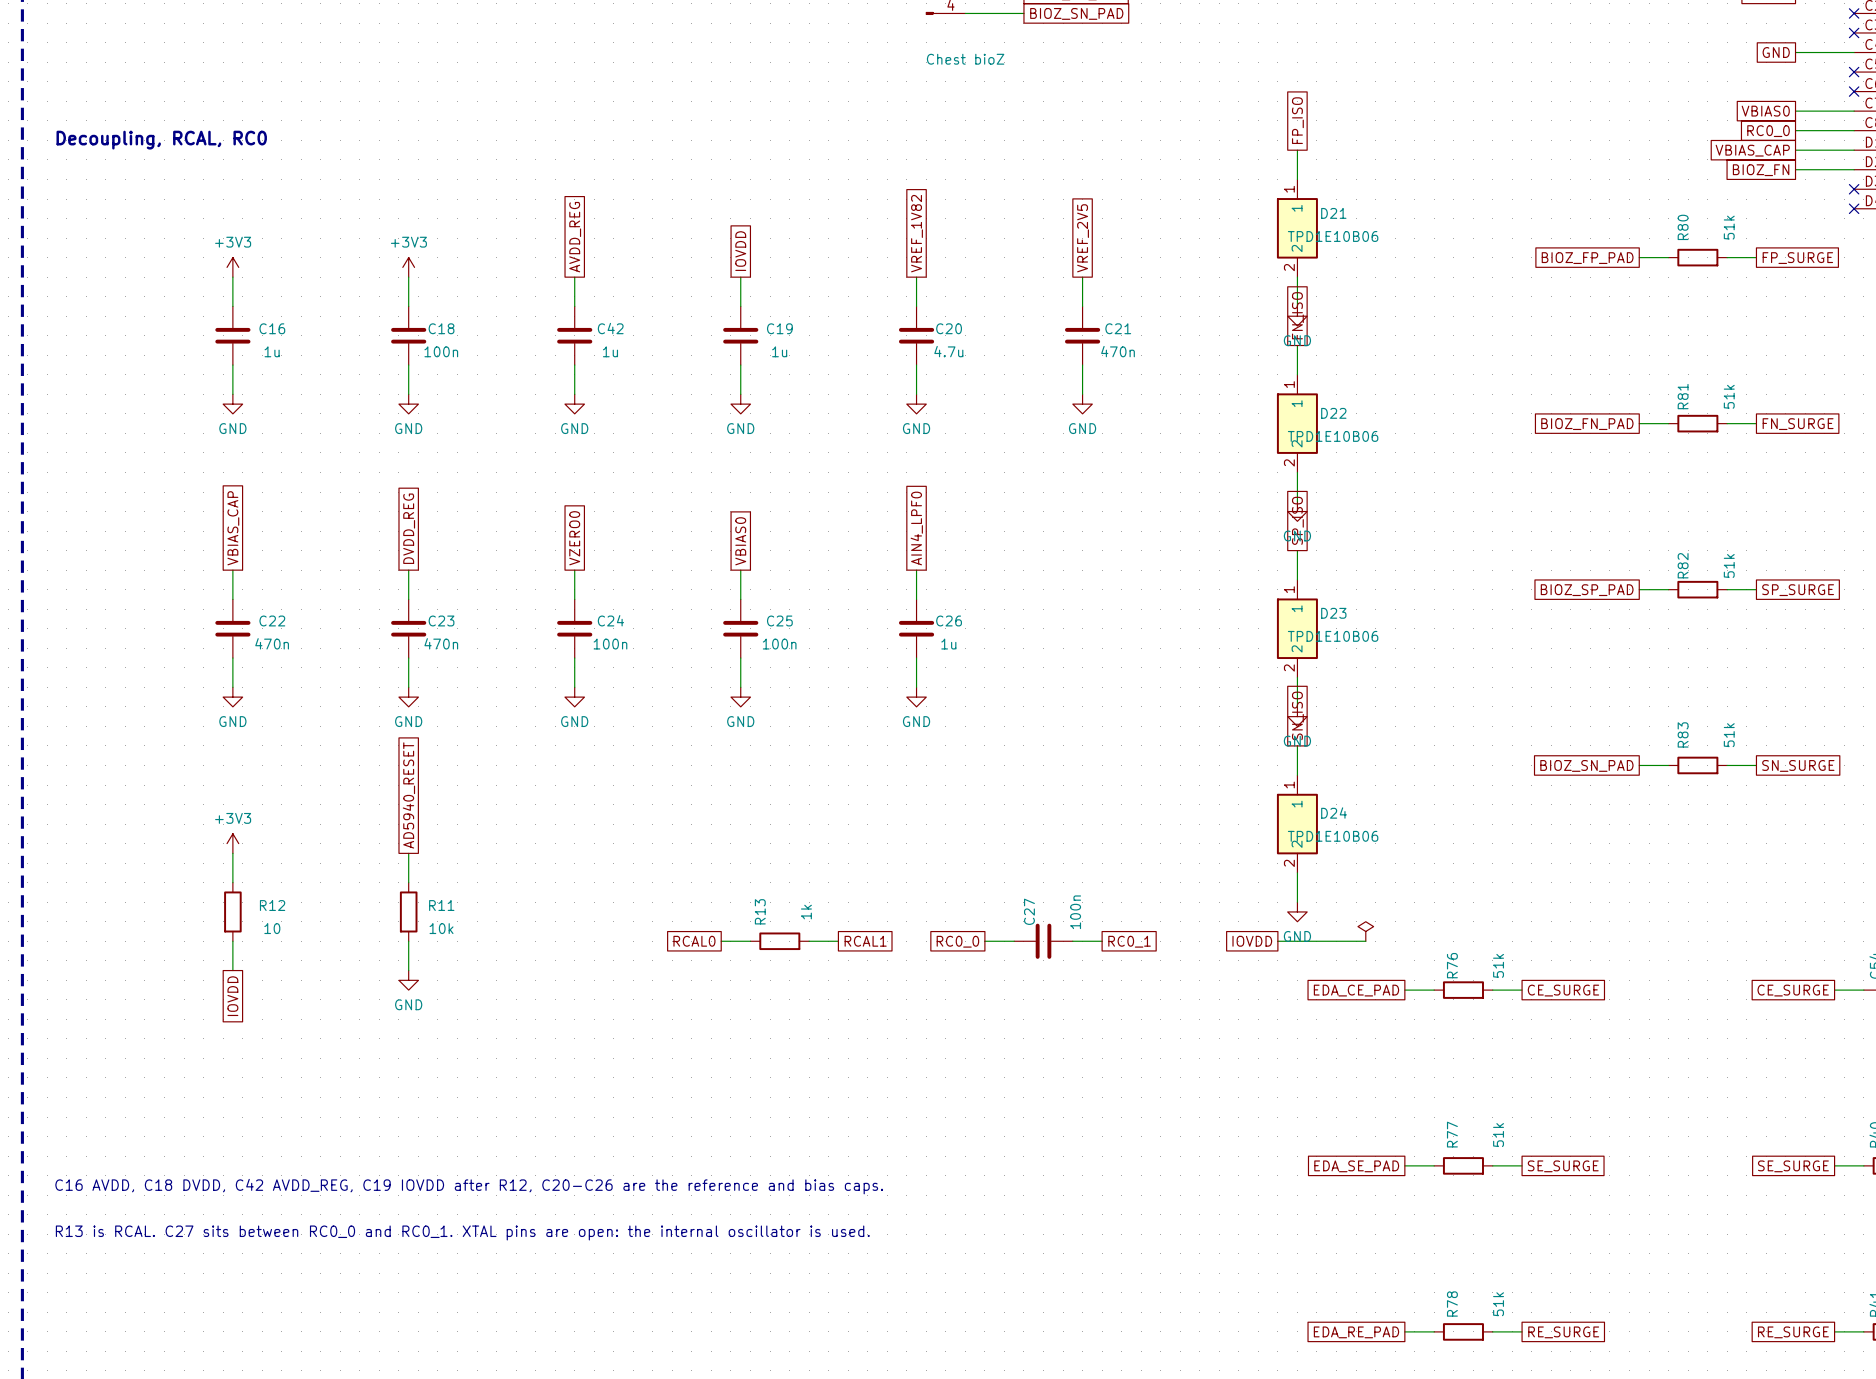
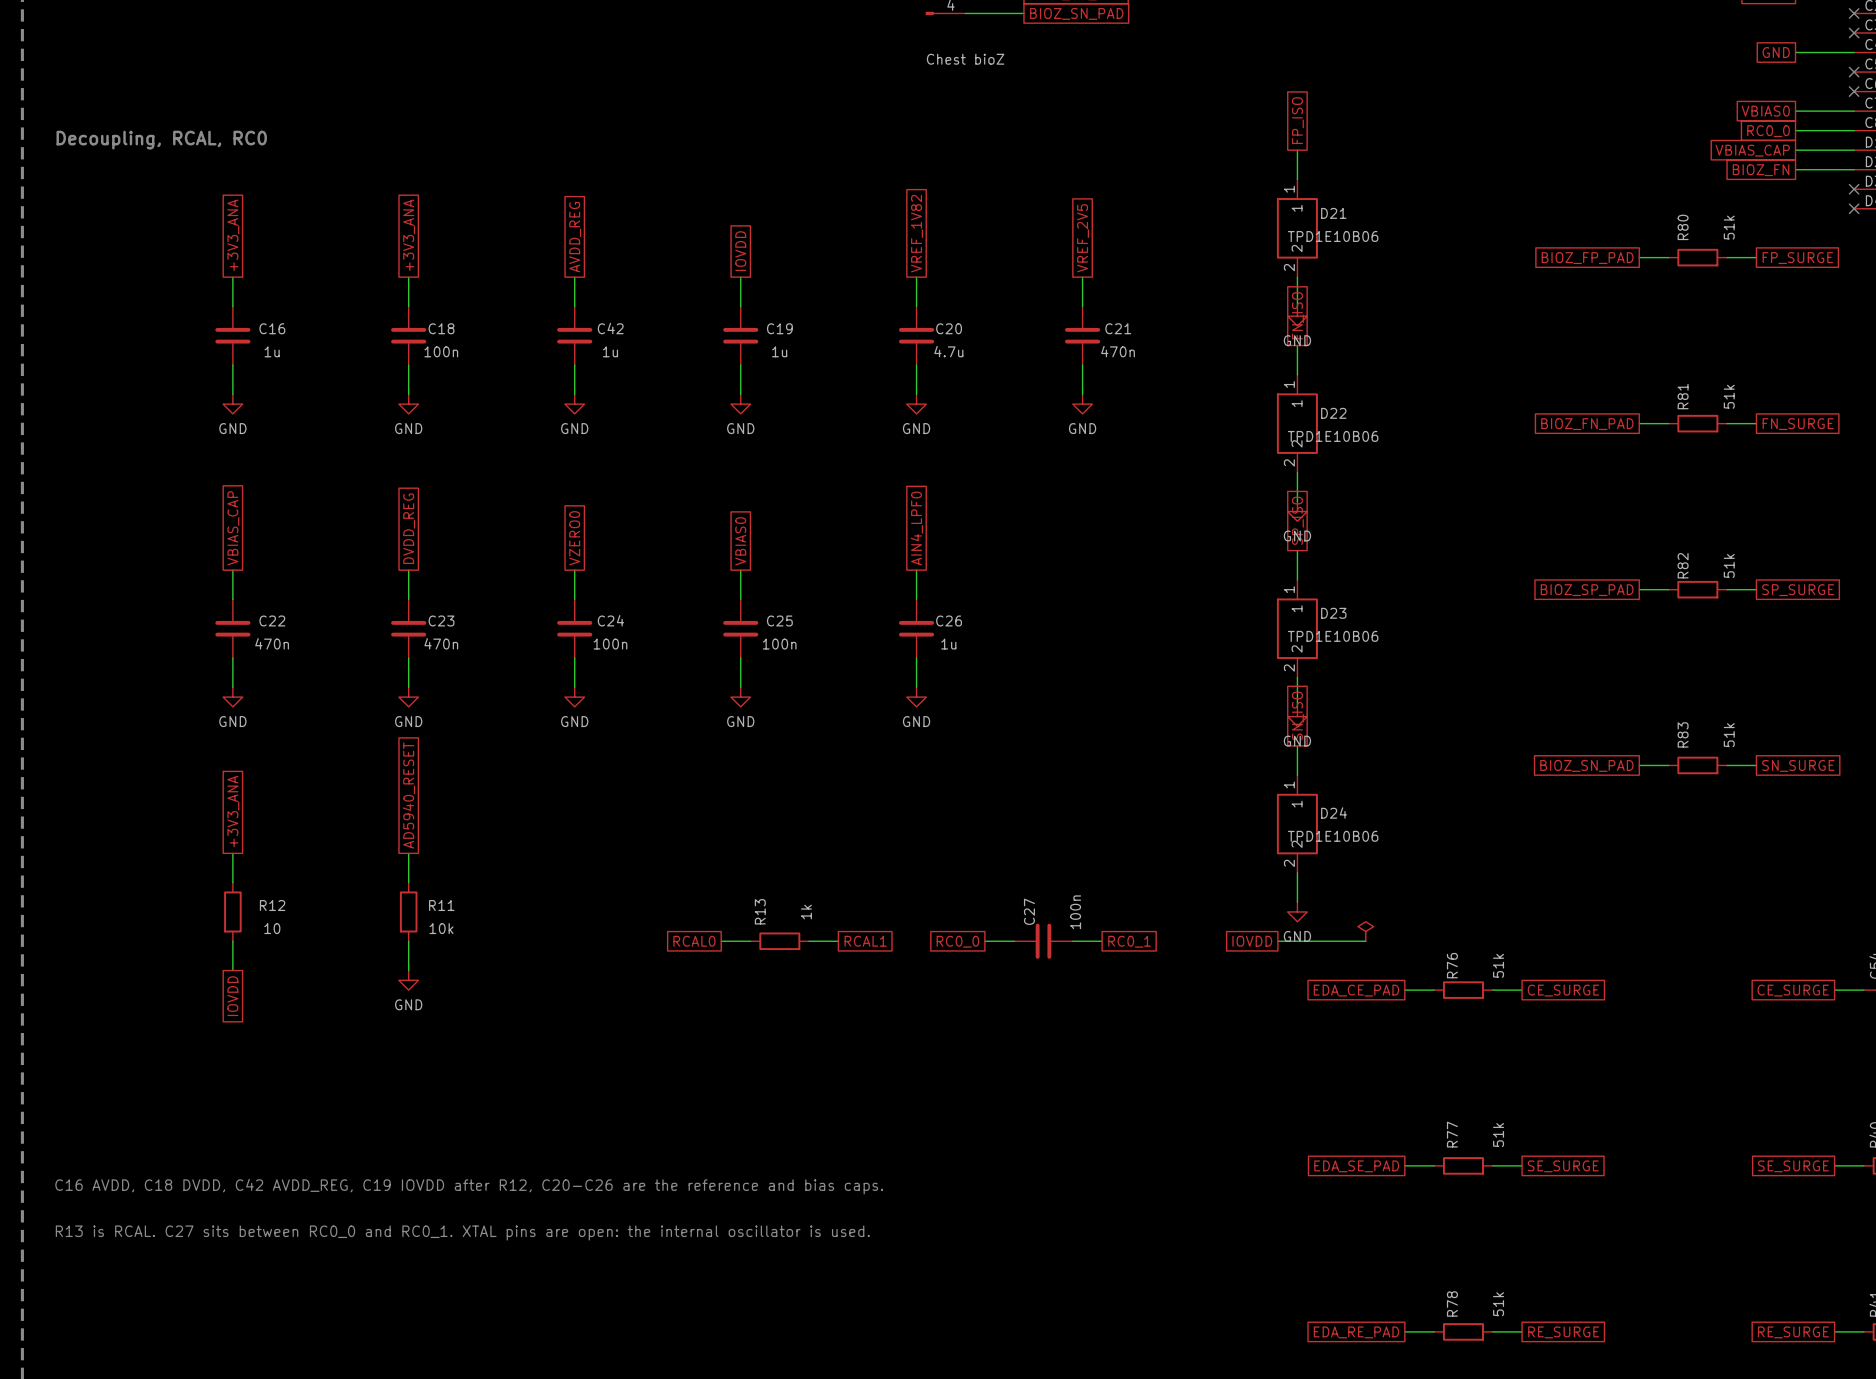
global label: none -> +3V3_ANA (233, 235)
global label: none -> +3V3_ANA (409, 235)
power symbol: +3V3 (232, 267) -> none
power symbol: +3V3 (408, 267) -> none
global label: none -> +3V3_ANA (233, 811)
power symbol: +3V3 (232, 843) -> none

